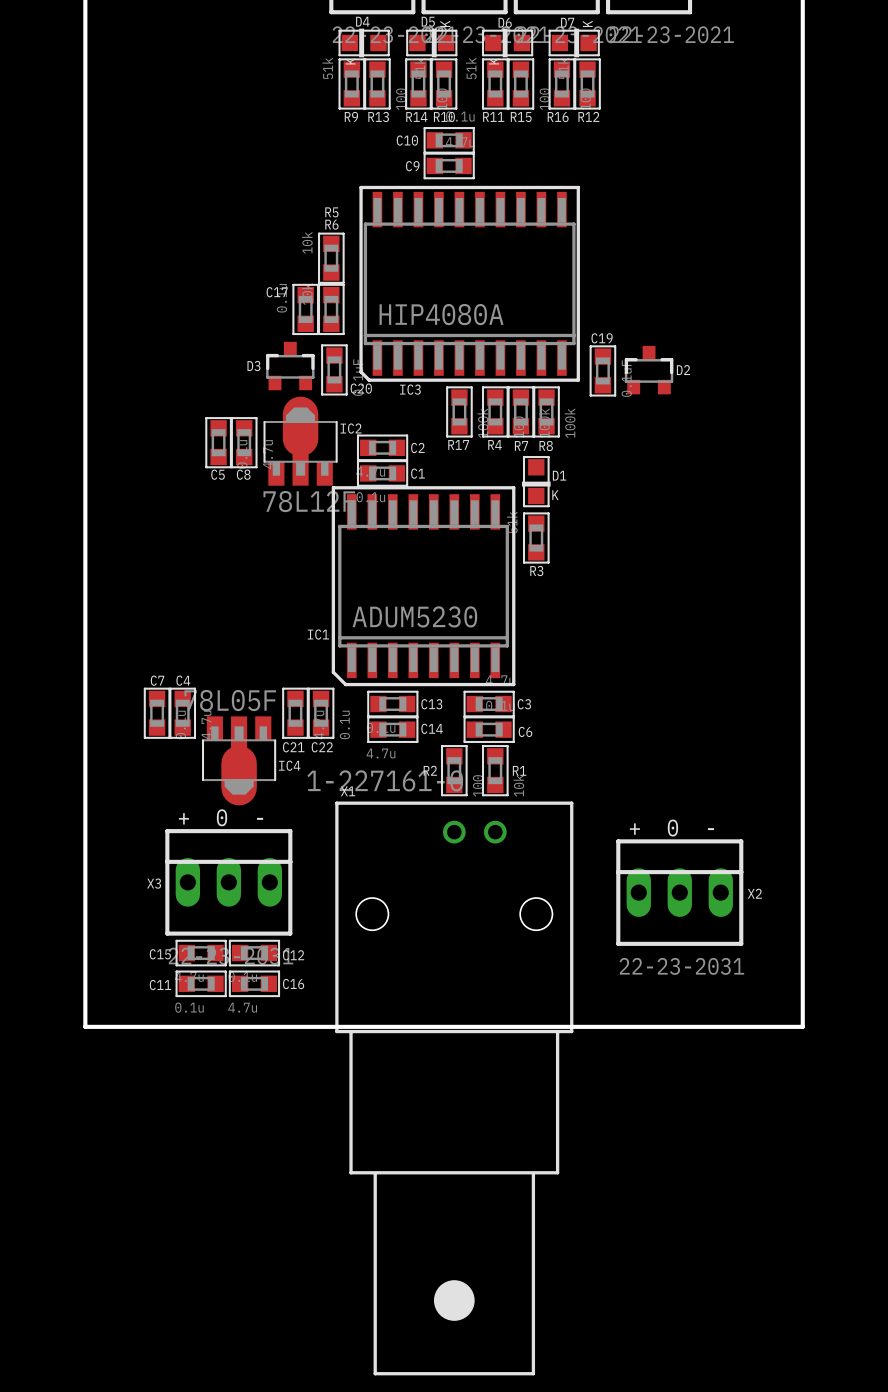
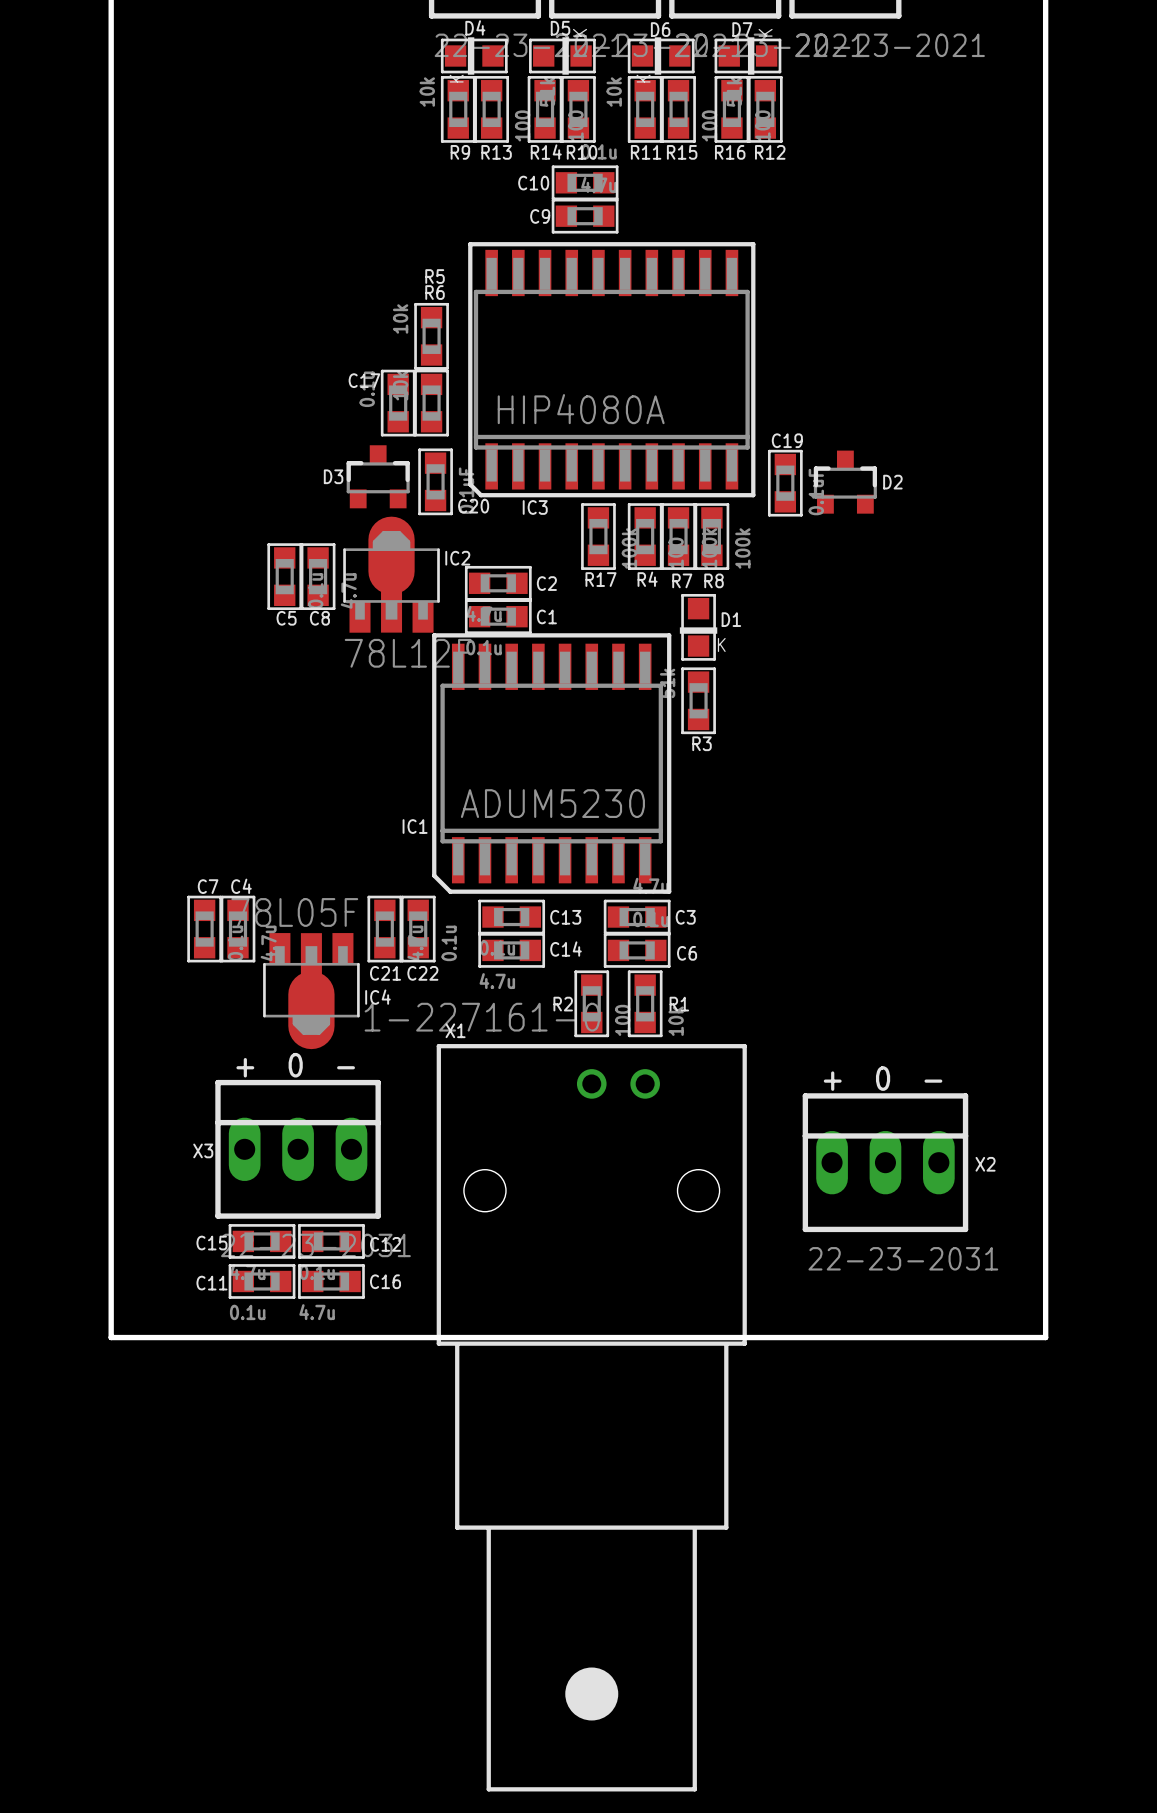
R9 value: 51k (327, 68) -> 10k (427, 92)
R11 value: 51k (471, 68) -> 10k (614, 92)

